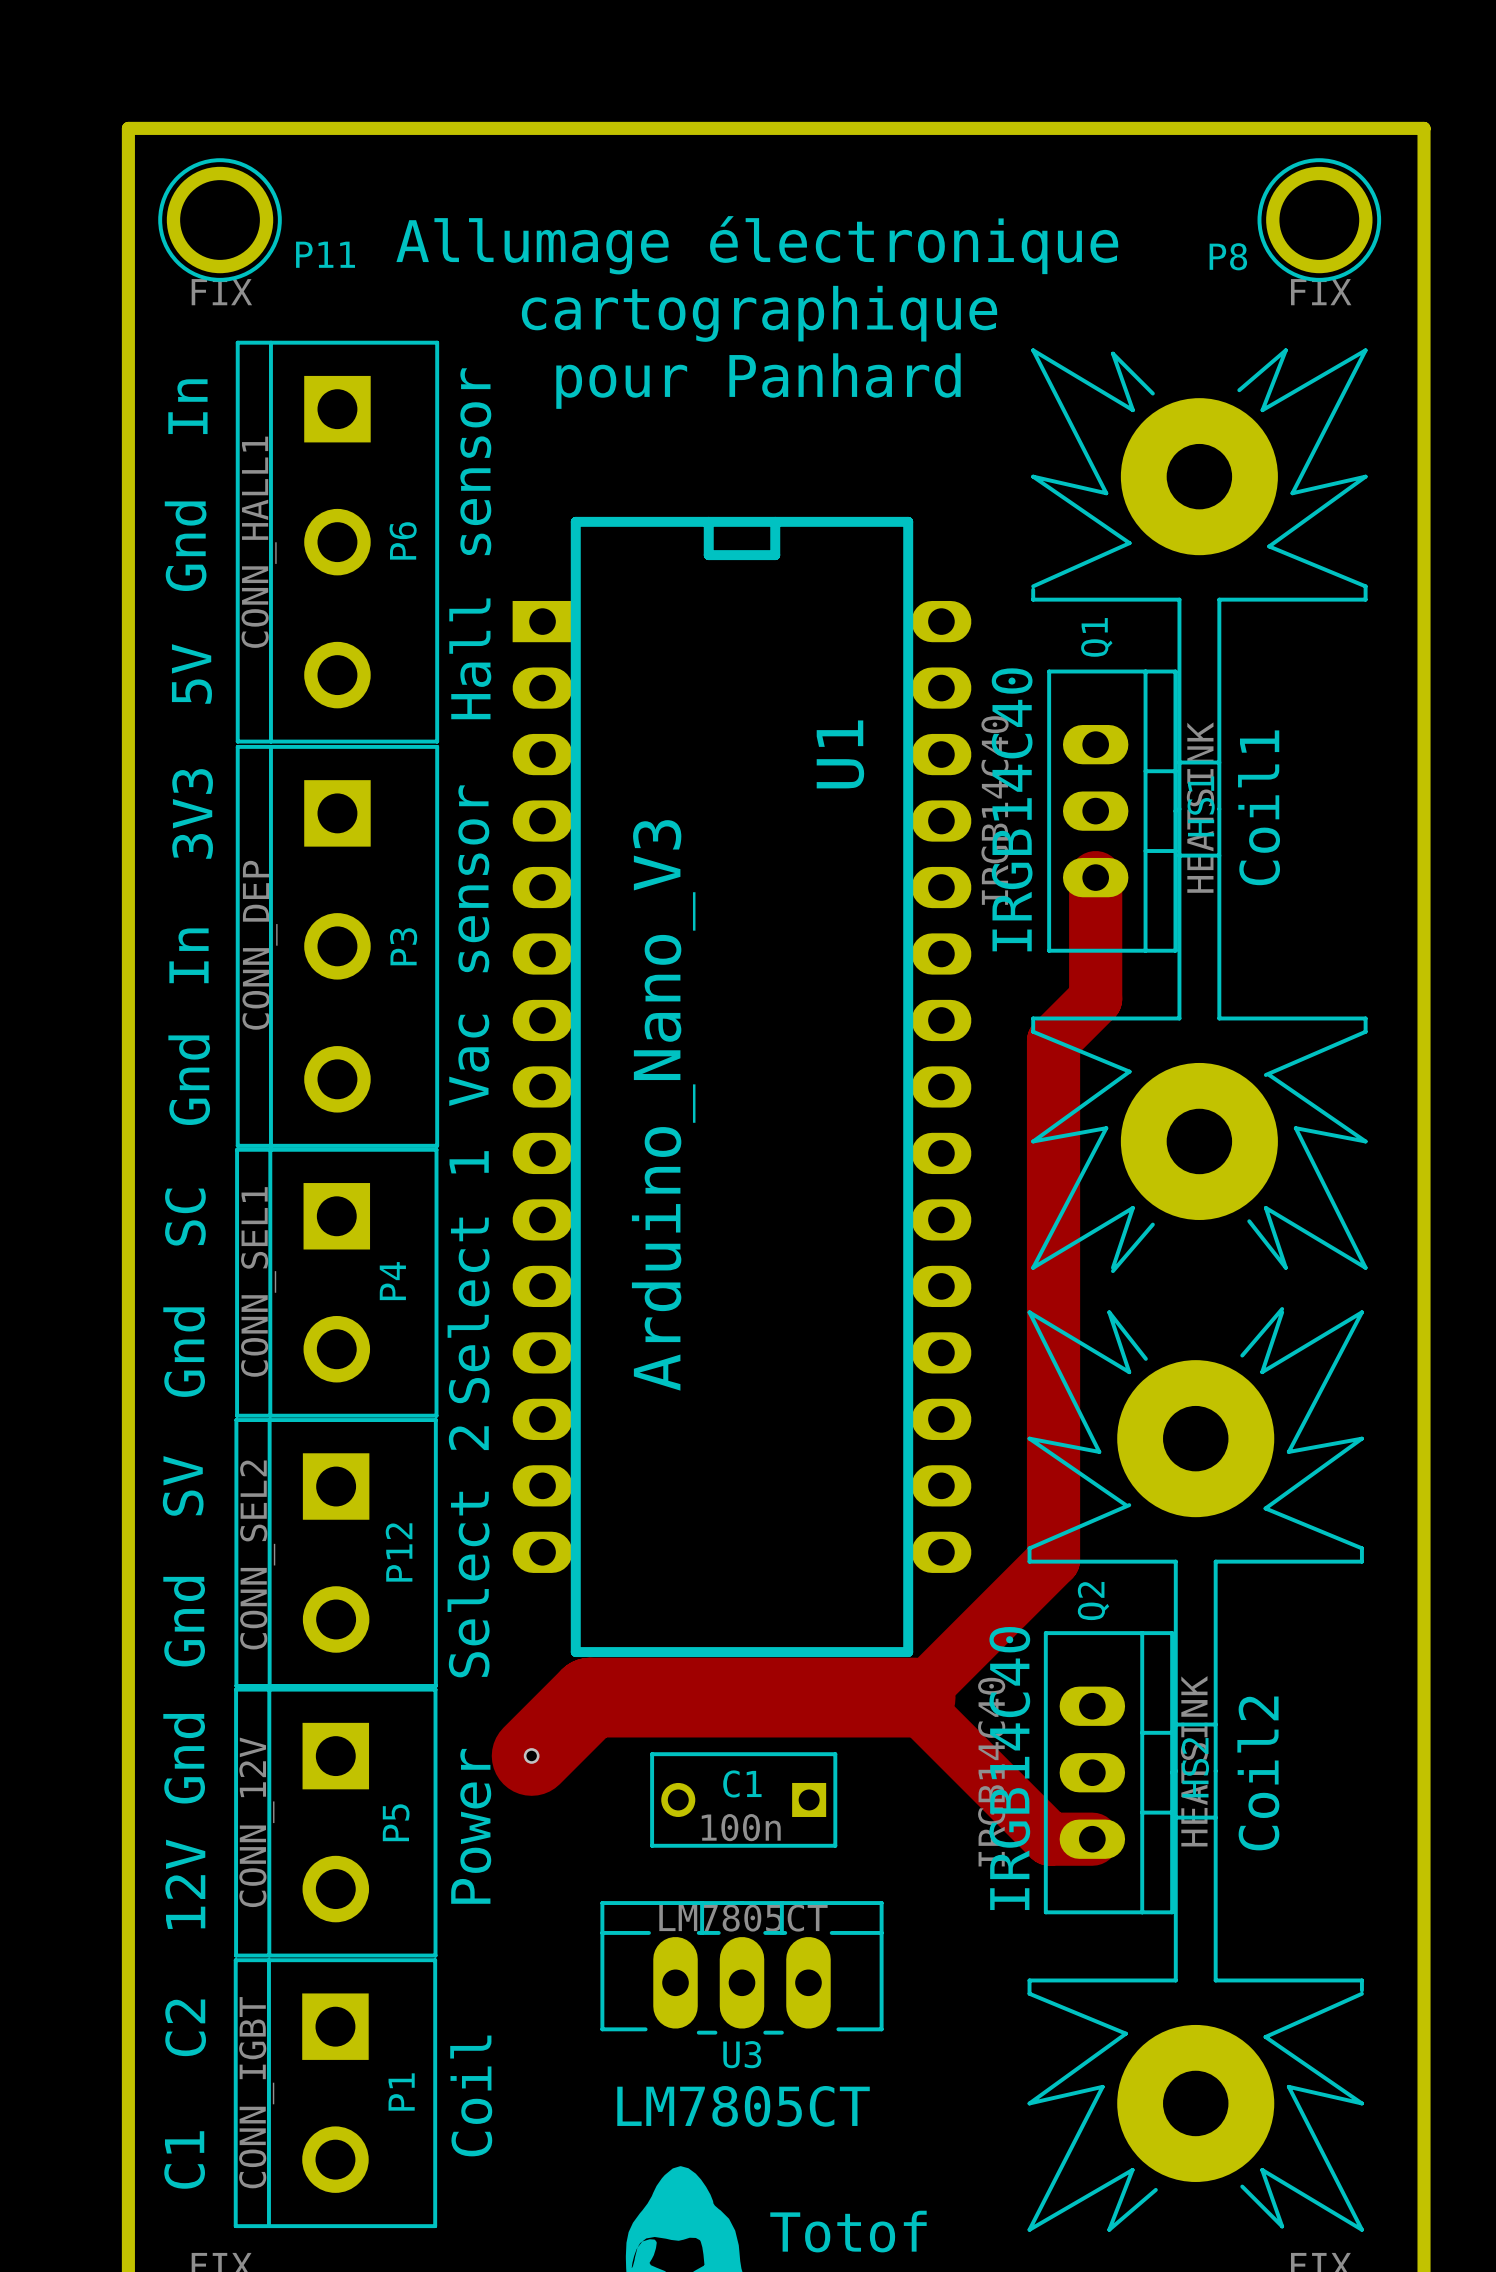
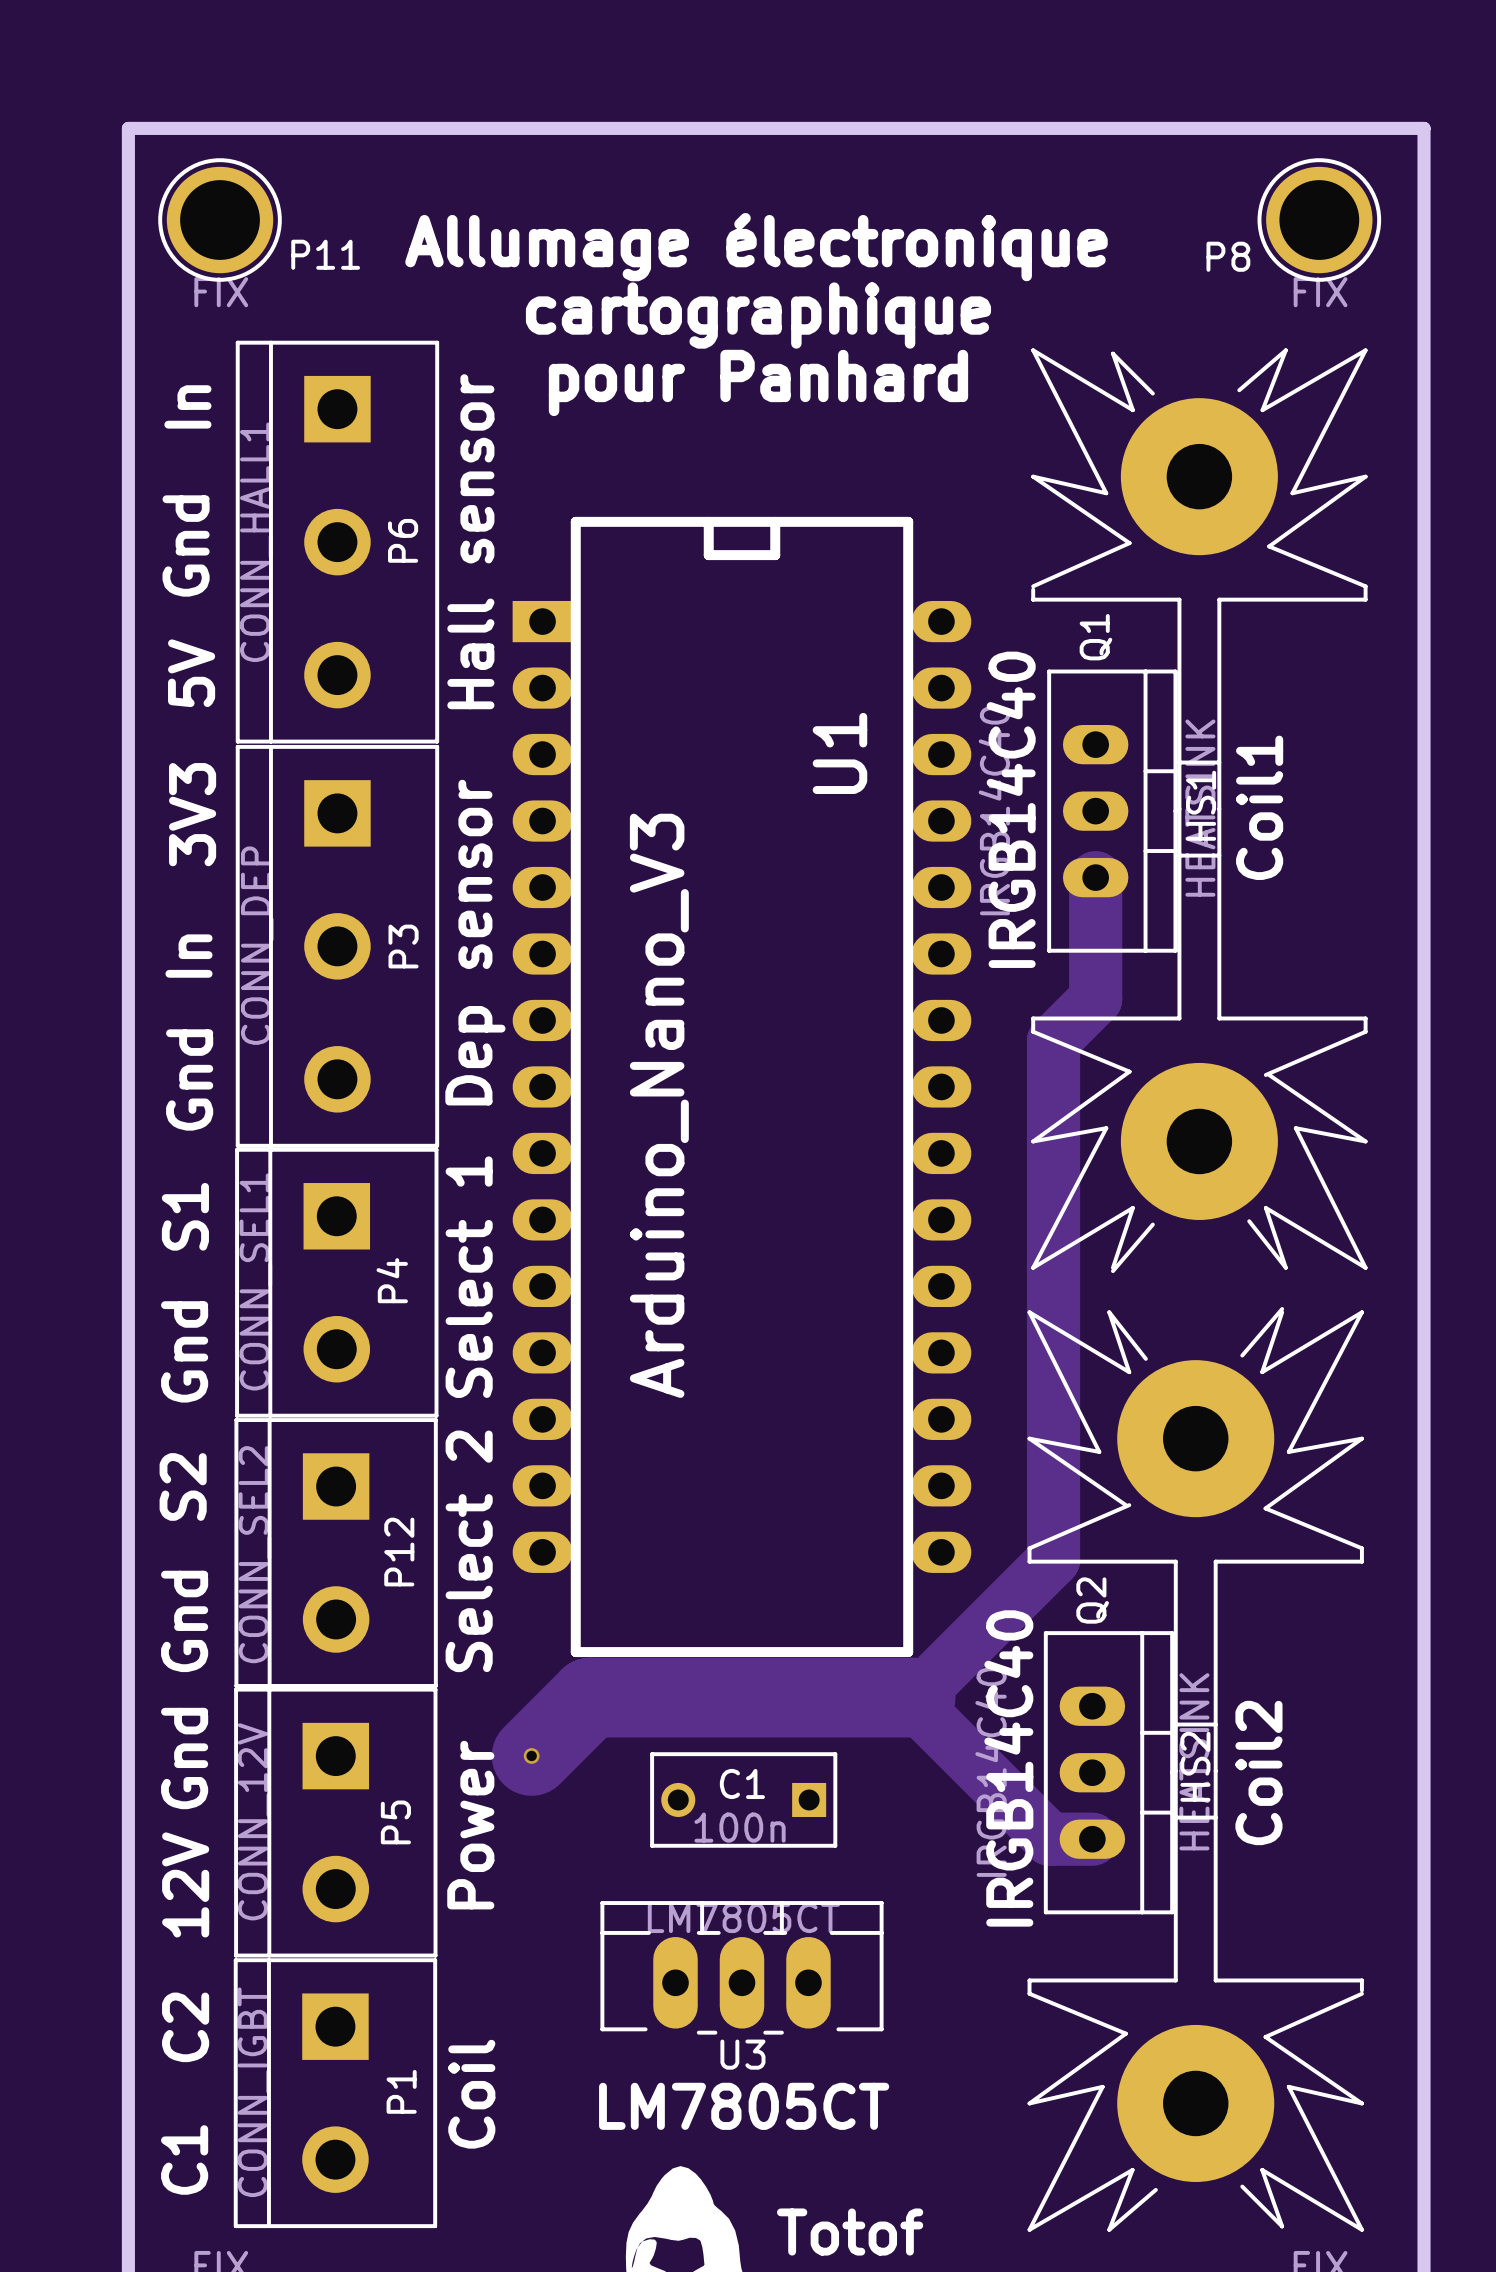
text: Vac sensor (469, 945) -> Dep sensor (475, 942)
text: SC (185, 1217) -> S1 (185, 1216)
text: SV (183, 1485) -> S2 (183, 1486)

